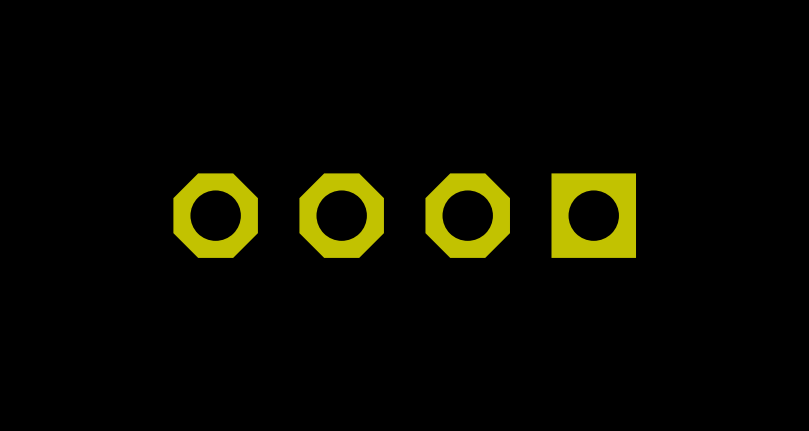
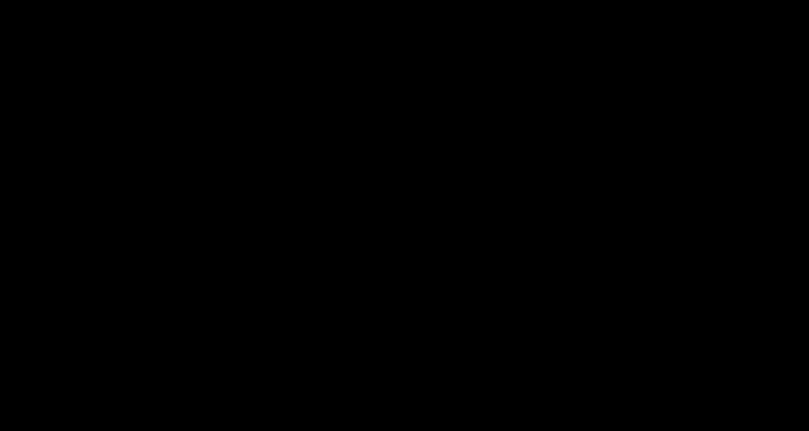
part: (404, 215) -> none

